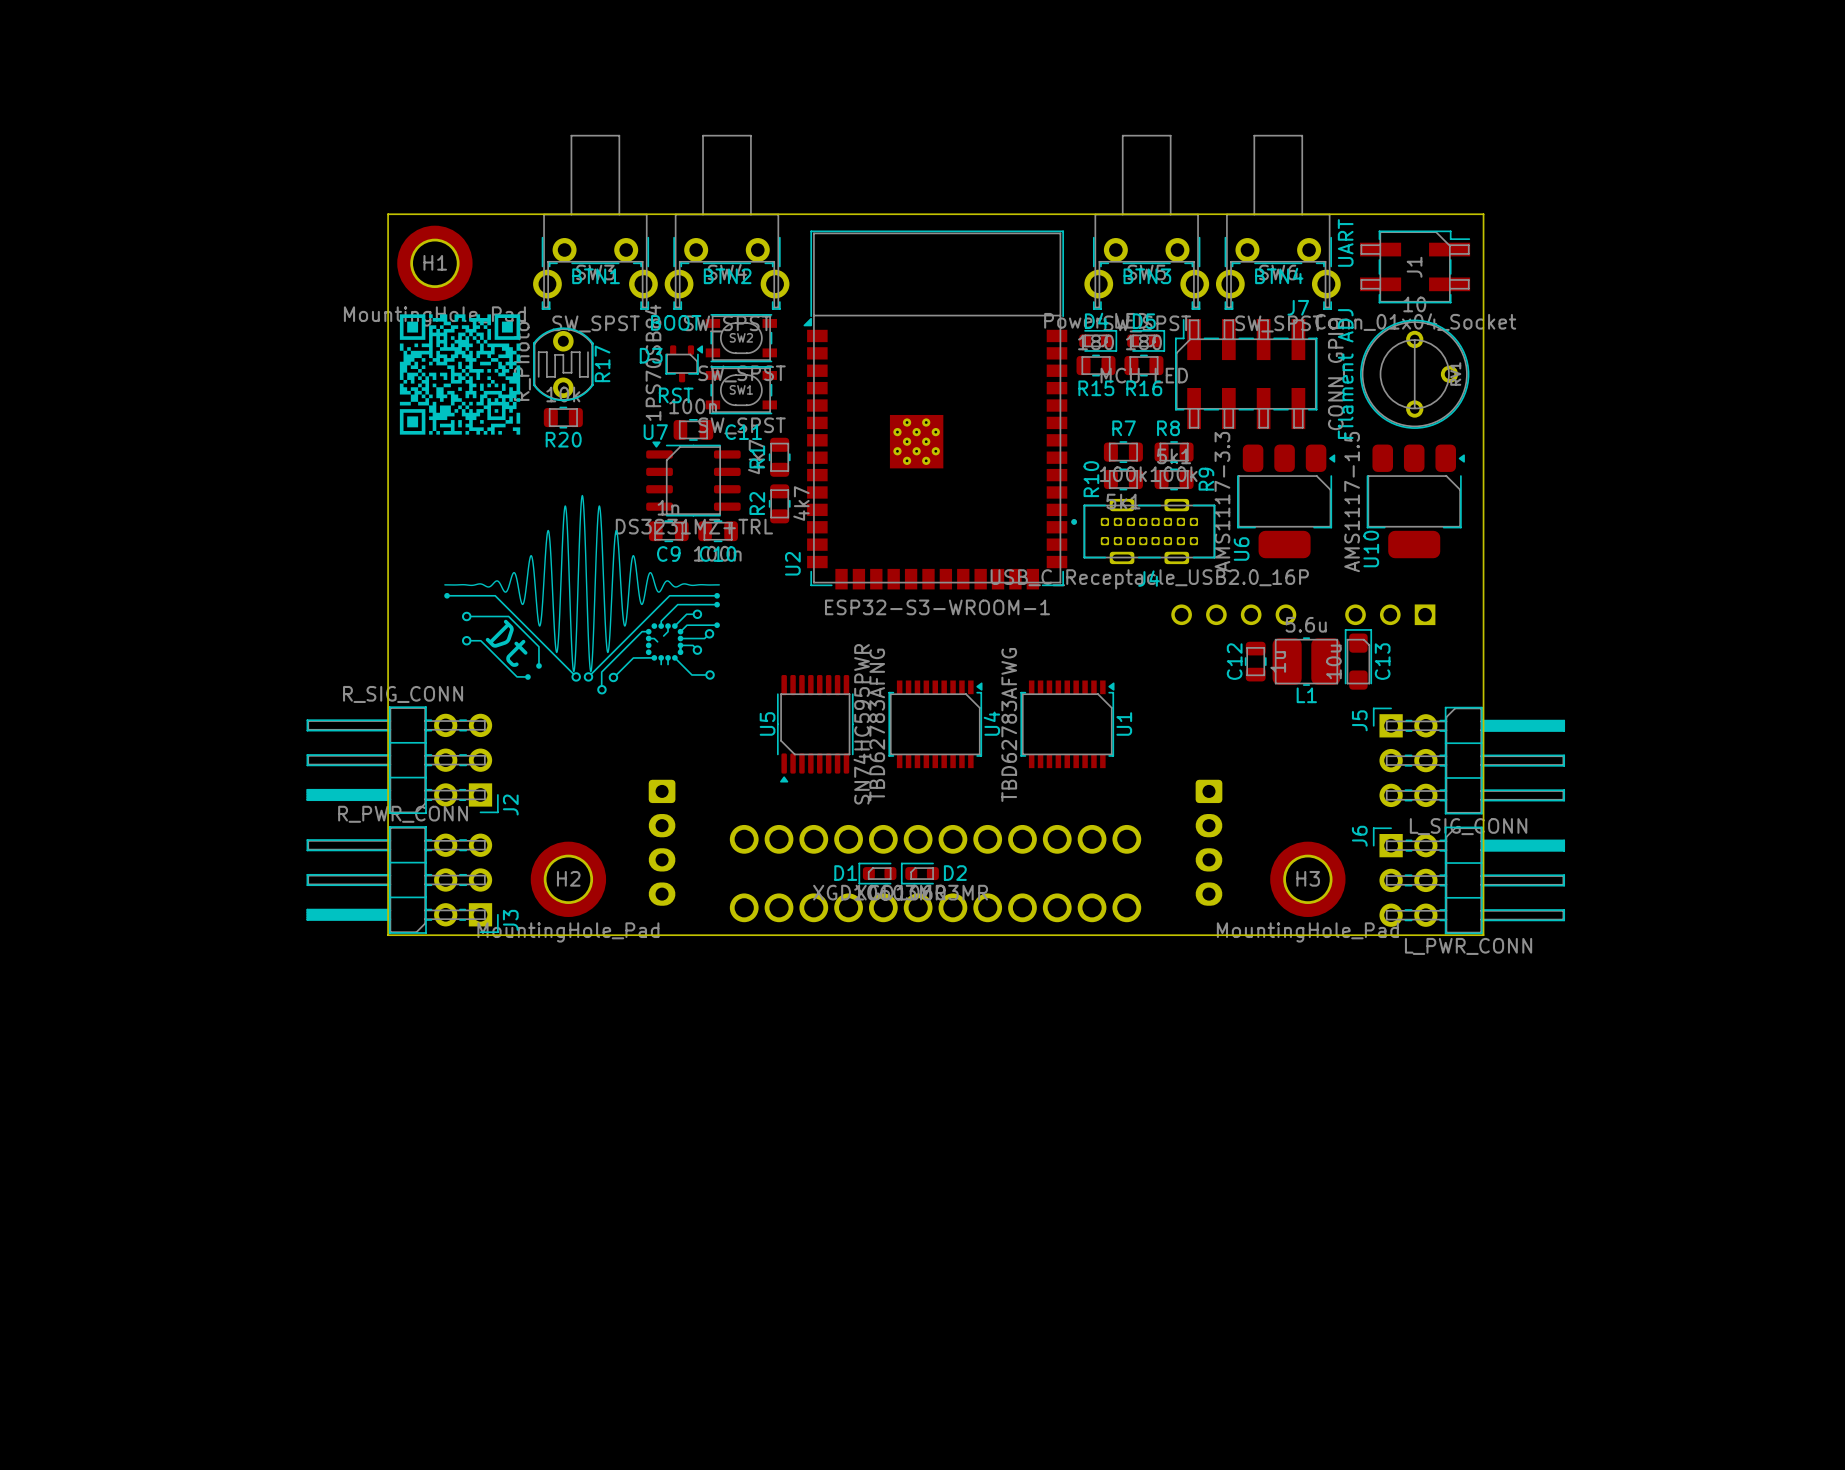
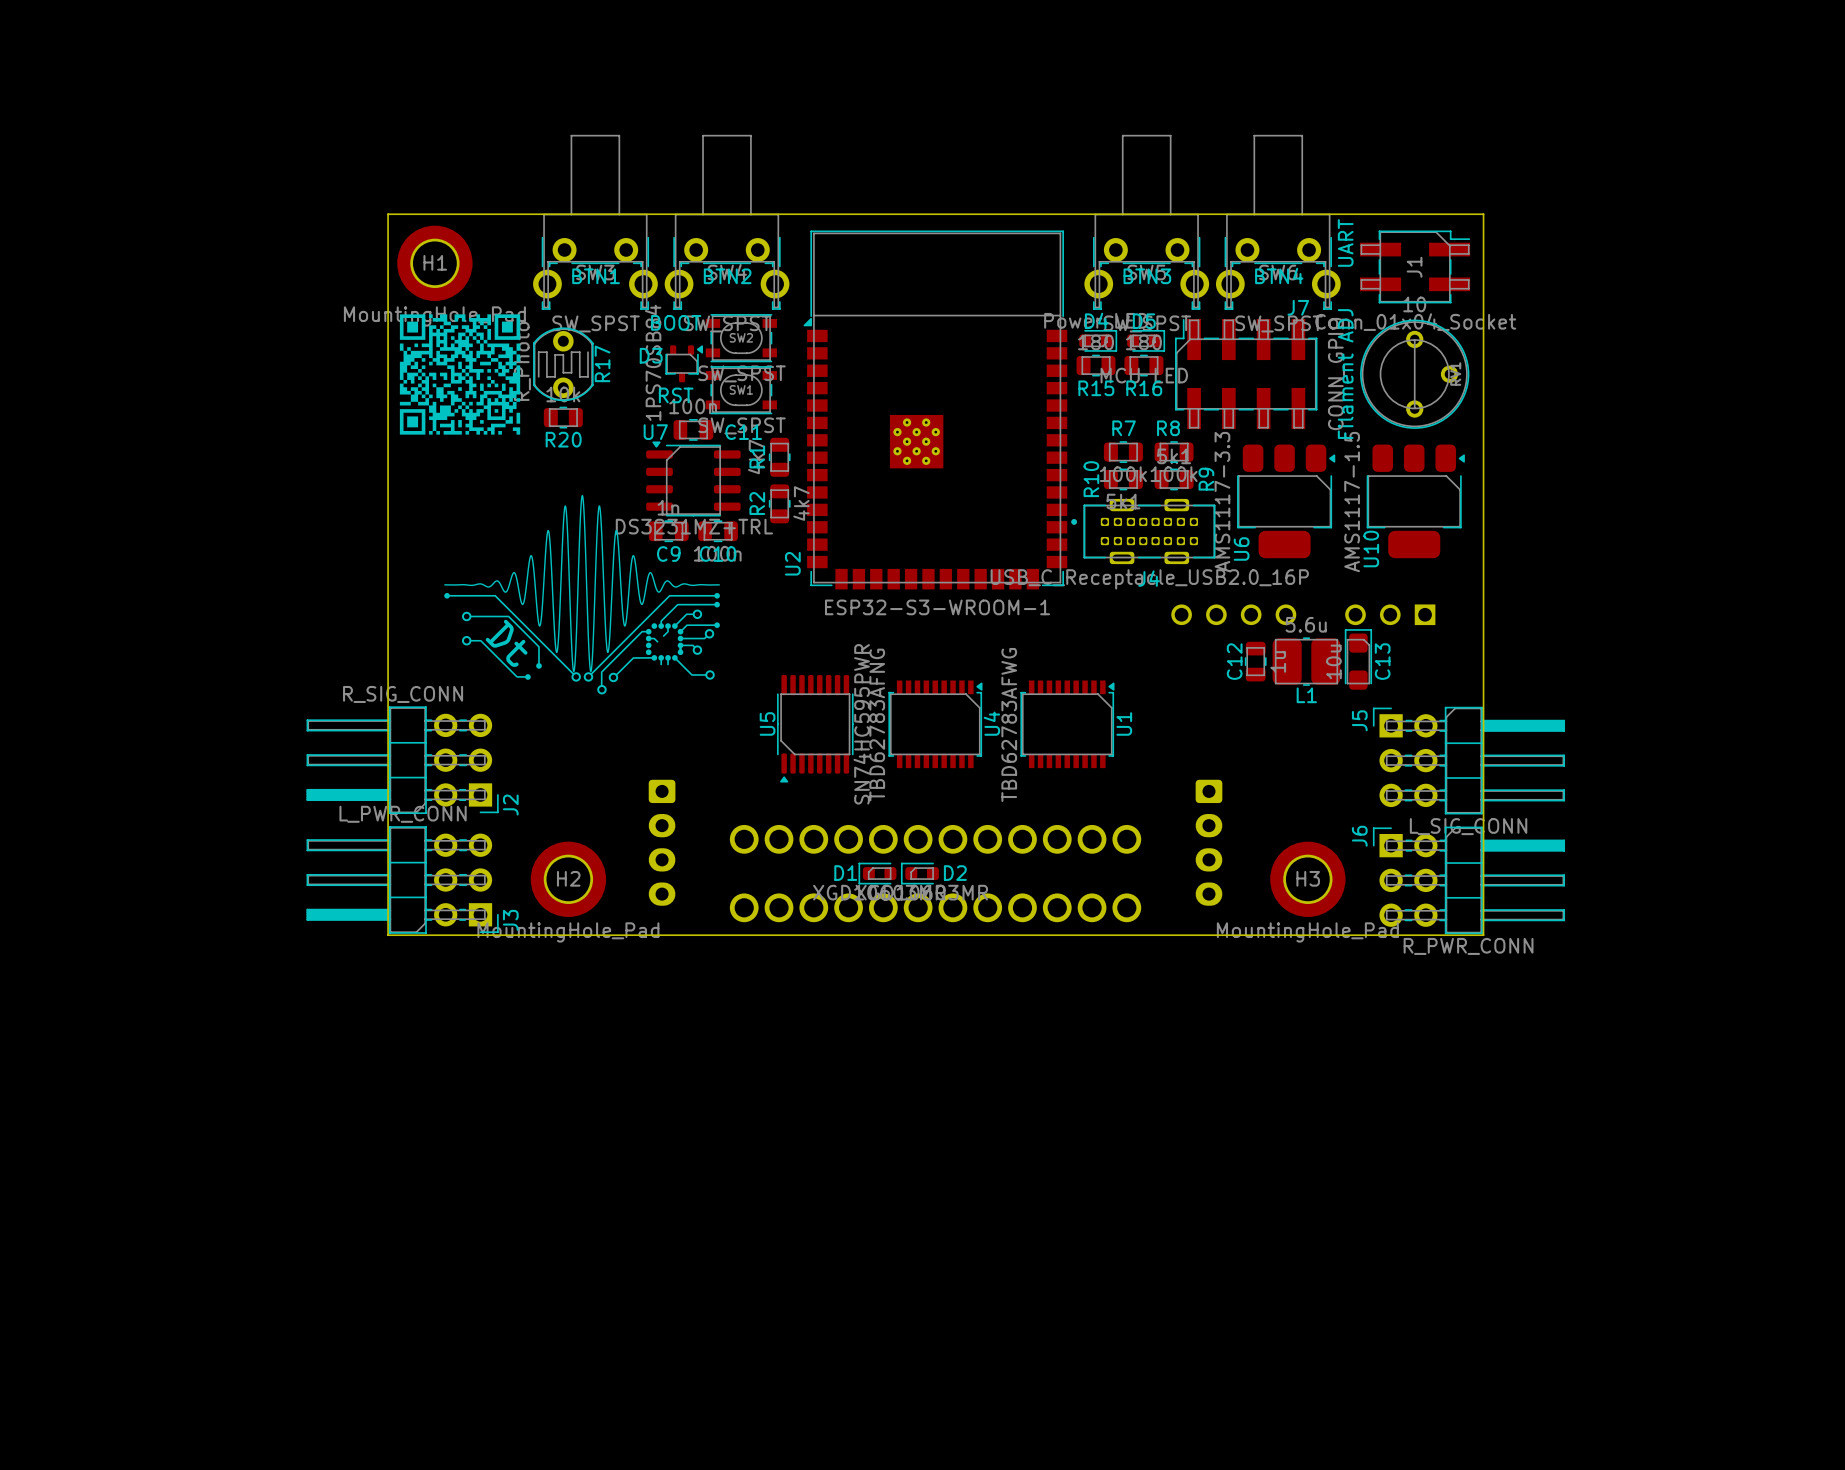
J3 value: R_PWR_CONN (403, 814) -> L_PWR_CONN (403, 814)
J6 value: L_PWR_CONN (1468, 946) -> R_PWR_CONN (1468, 946)

